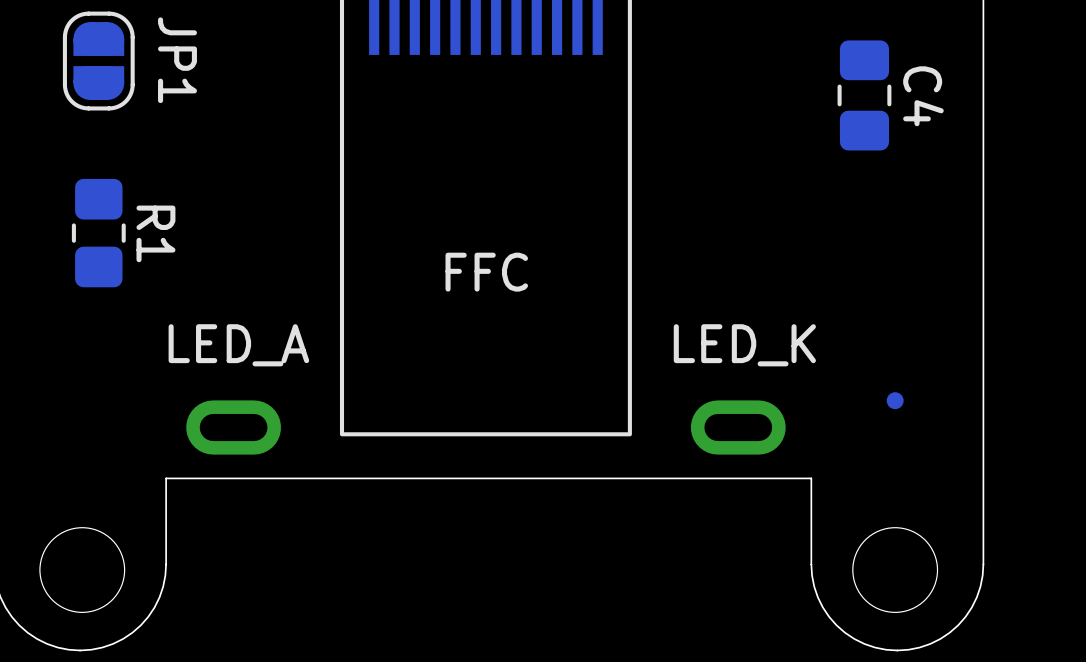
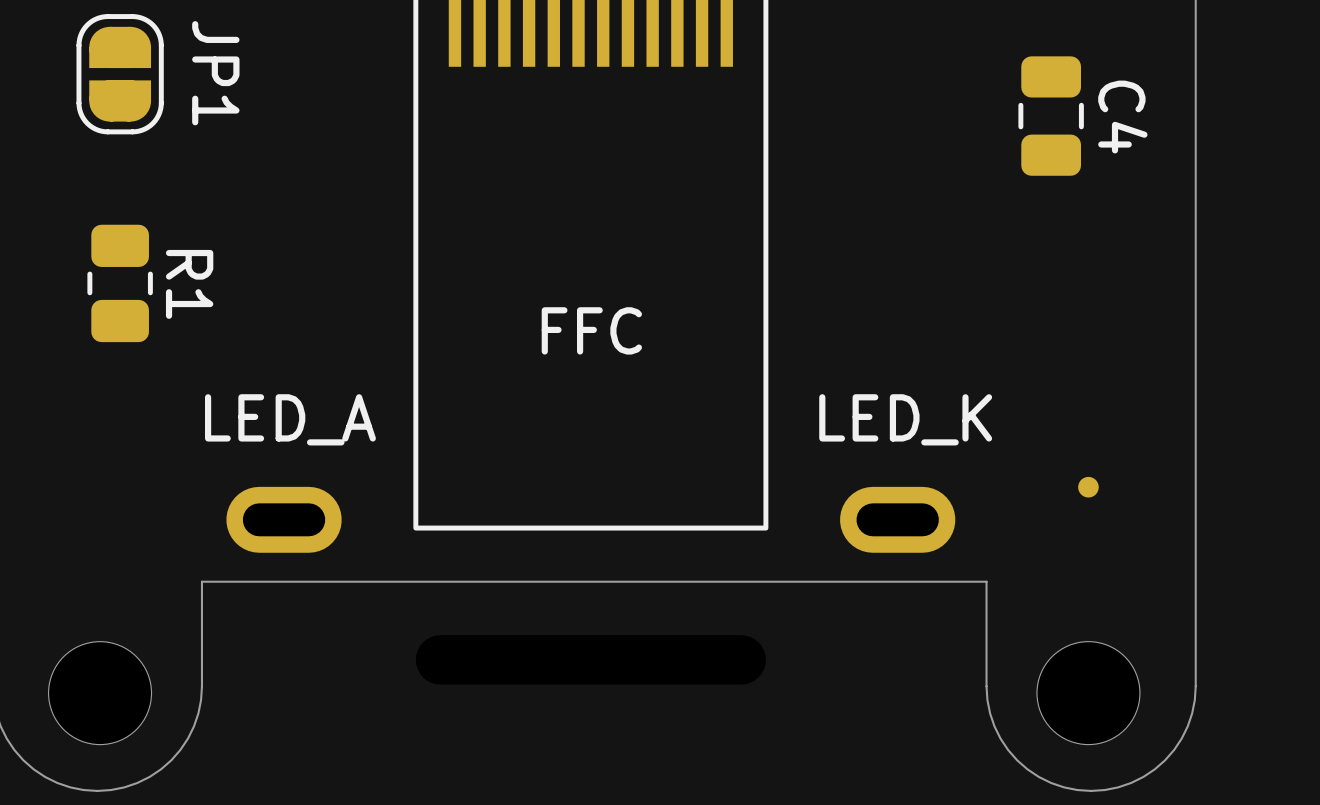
C4 footprint: [837, 40, 892, 151] -> [1018, 56, 1084, 176]
R1 footprint: [71, 178, 126, 288] -> [87, 224, 153, 343]

